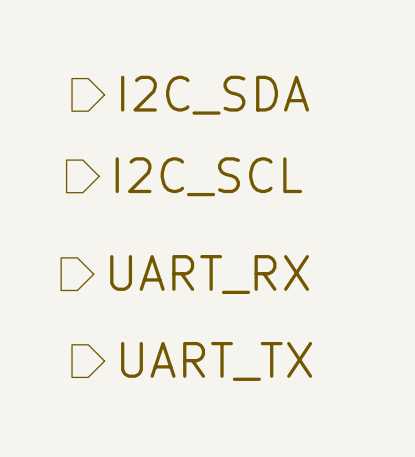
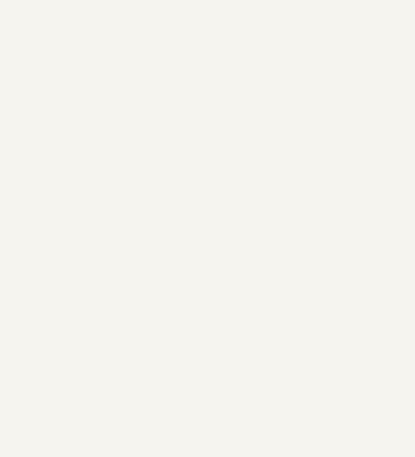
hierarchical label: I2C_SDA (215, 95) -> none
hierarchical label: I2C_SCL (208, 176) -> none
hierarchical label: UART_RX (209, 274) -> none
hierarchical label: UART_TX (216, 361) -> none

